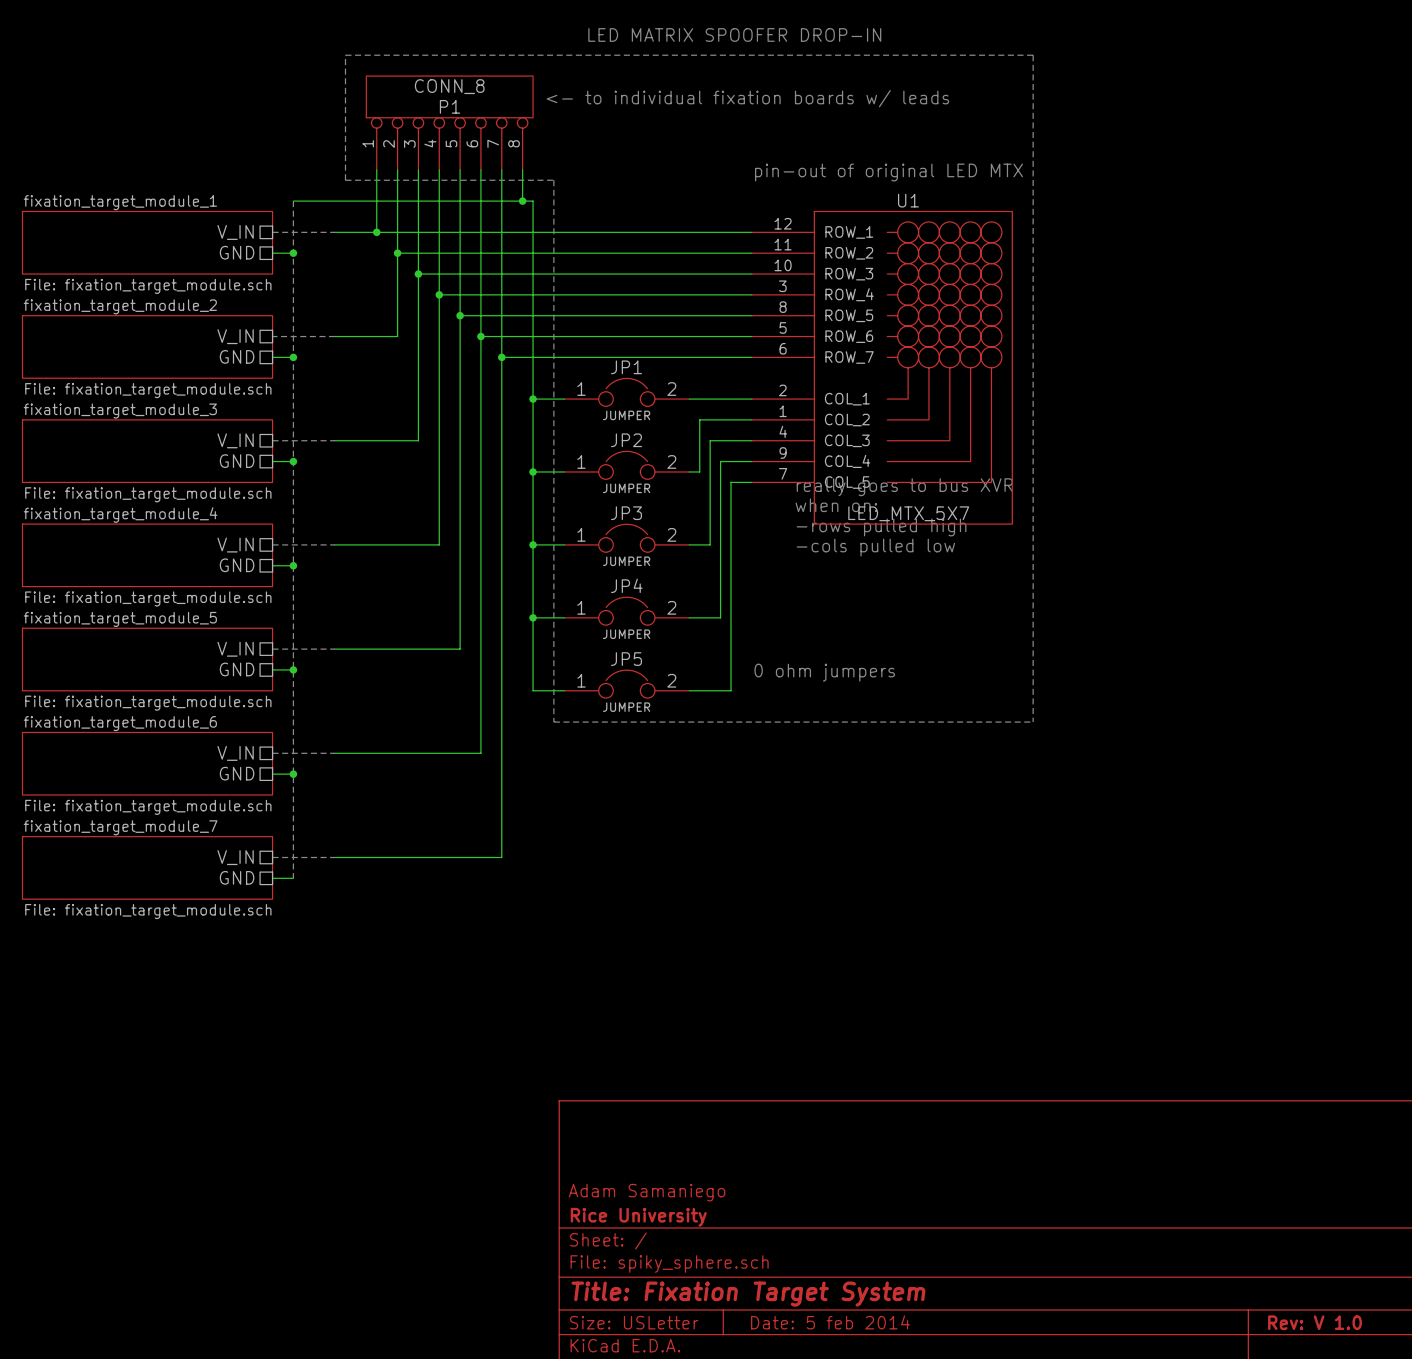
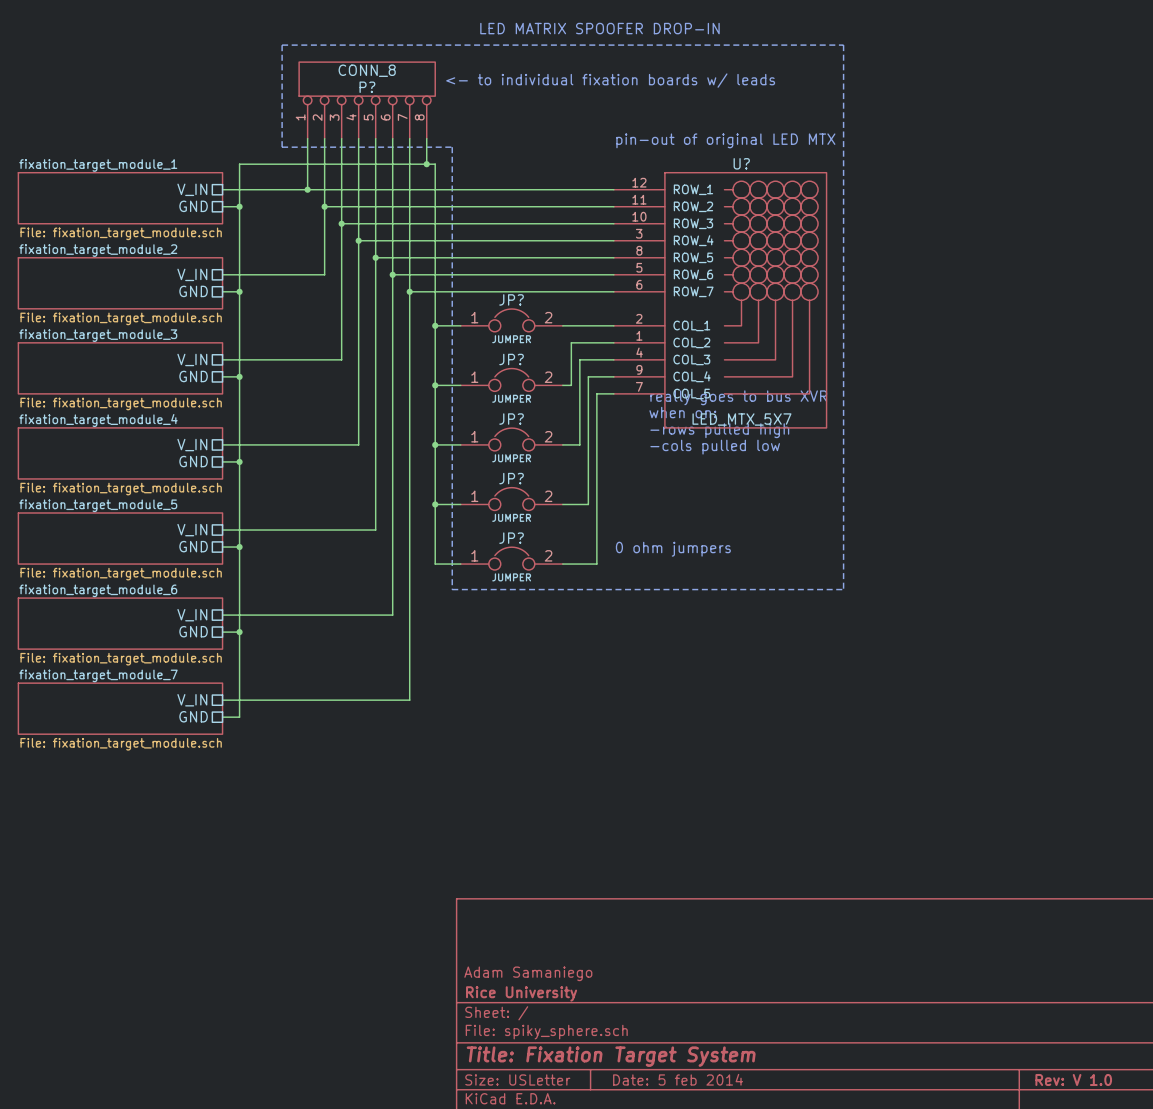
P1 name: P1 (449, 106) -> P? (367, 87)
U1 name: U1 (908, 200) -> U? (741, 163)
line: (293, 201) (293, 878) -> none
line: (272, 232) (335, 232) -> none
line: (272, 336) (335, 336) -> none
JP1 name: JP1 (626, 367) -> JP? (511, 299)
line: (272, 440) (335, 440) -> none
JP2 name: JP2 (626, 440) -> JP? (511, 359)
JP3 name: JP3 (626, 513) -> JP? (511, 419)
line: (272, 544) (335, 544) -> none
JP4 name: JP4 (626, 585) -> JP? (511, 478)
line: (272, 649) (335, 649) -> none
JP5 name: JP5 (626, 659) -> JP? (511, 538)
line: (272, 753) (335, 753) -> none
line: (272, 857) (335, 857) -> none

